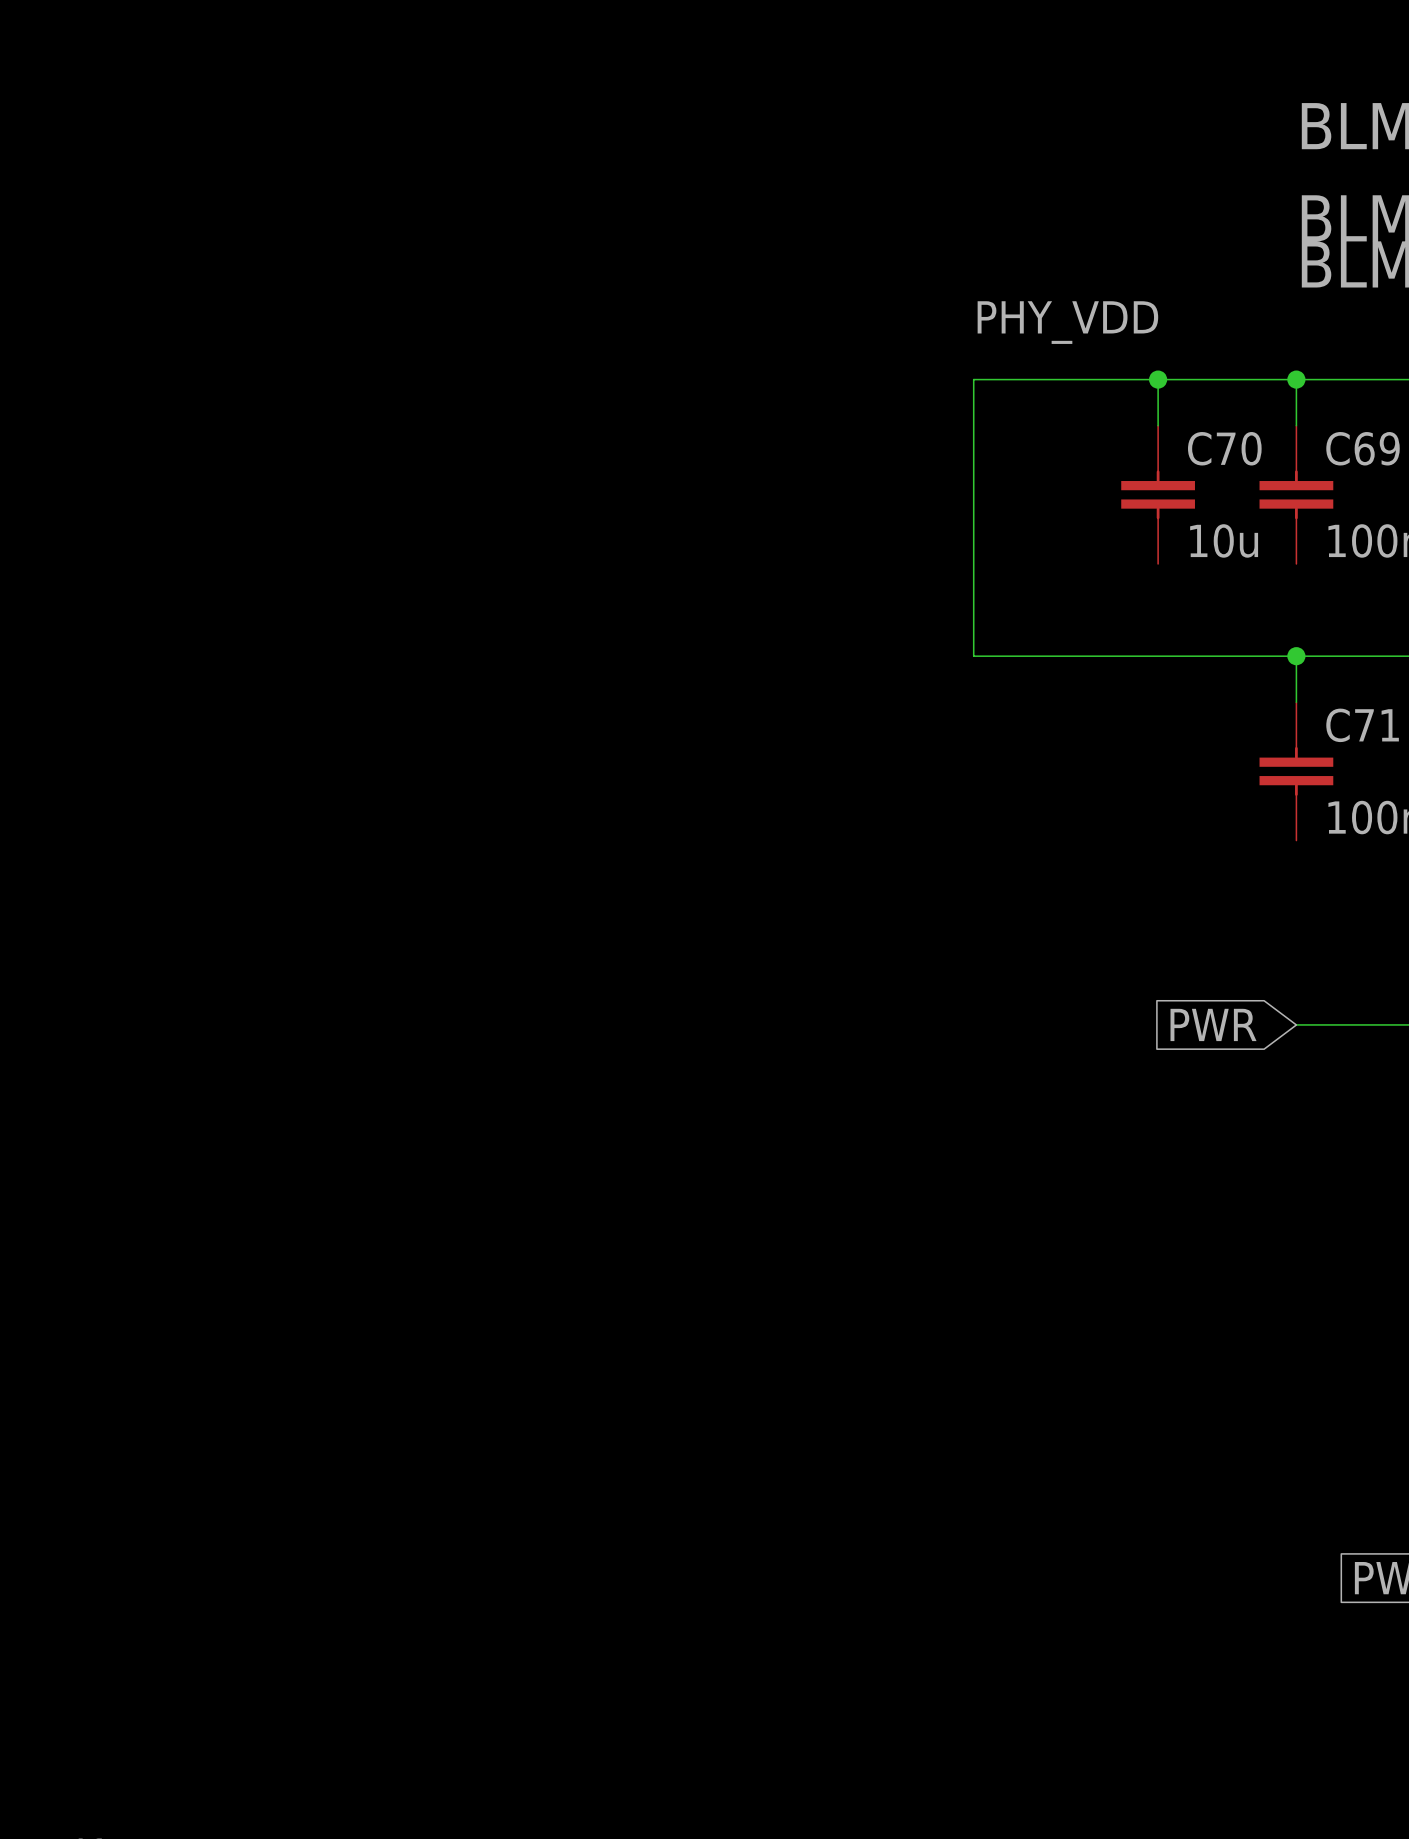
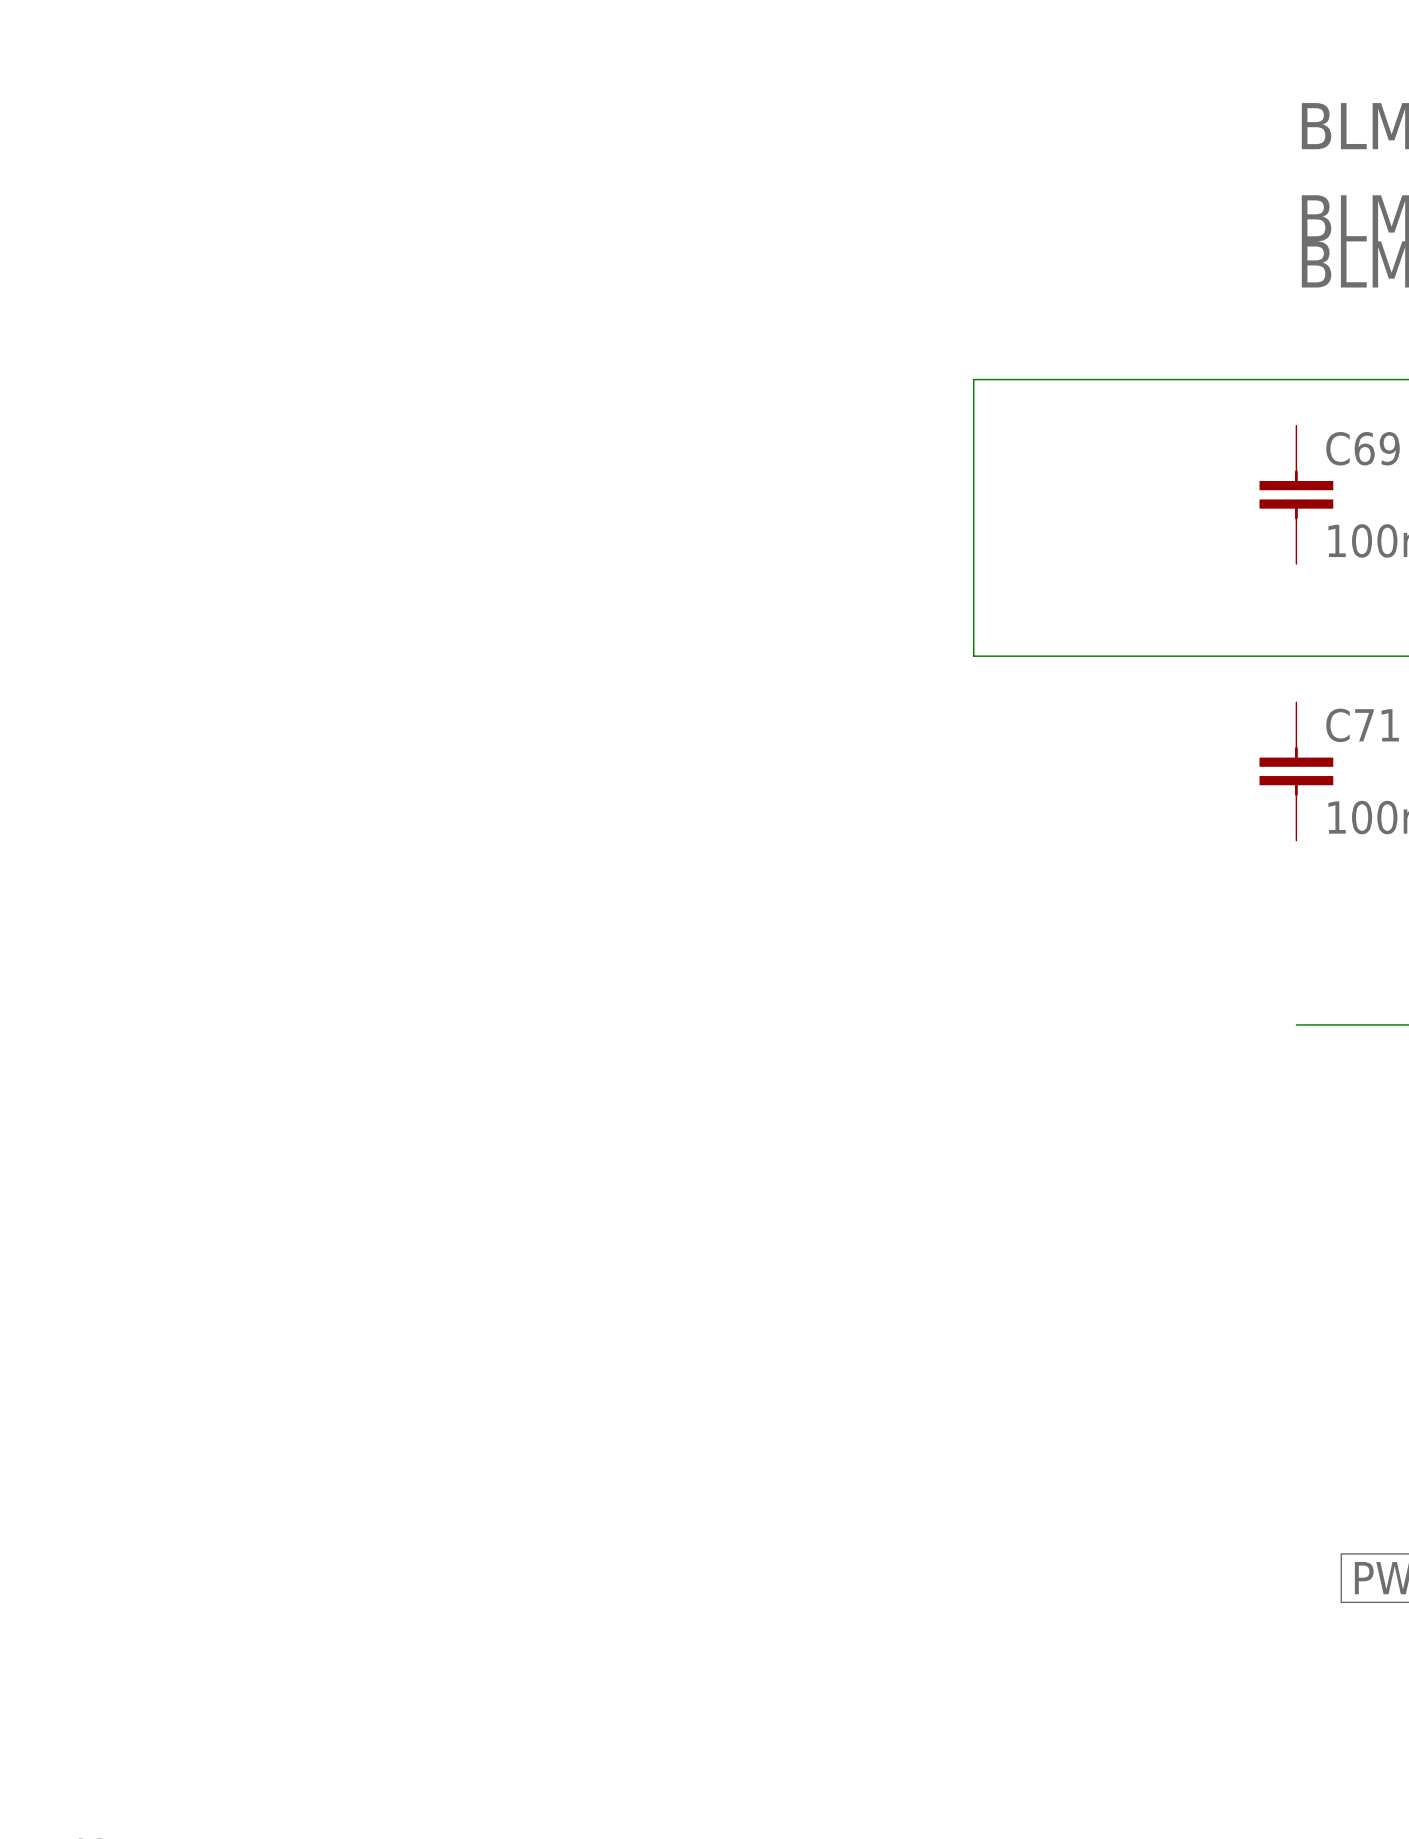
label: PHY_VDD (1067, 322) -> none
wire: (1158, 379) (1158, 425) -> none
junction: (1158, 379) -> none
wire: (1296, 379) (1296, 425) -> none
junction: (1296, 379) -> none
C70: 10u (1158, 494) -> none
wire: (1296, 656) (1296, 702) -> none
junction: (1296, 656) -> none
global label: PWR (1213, 1024) -> none

